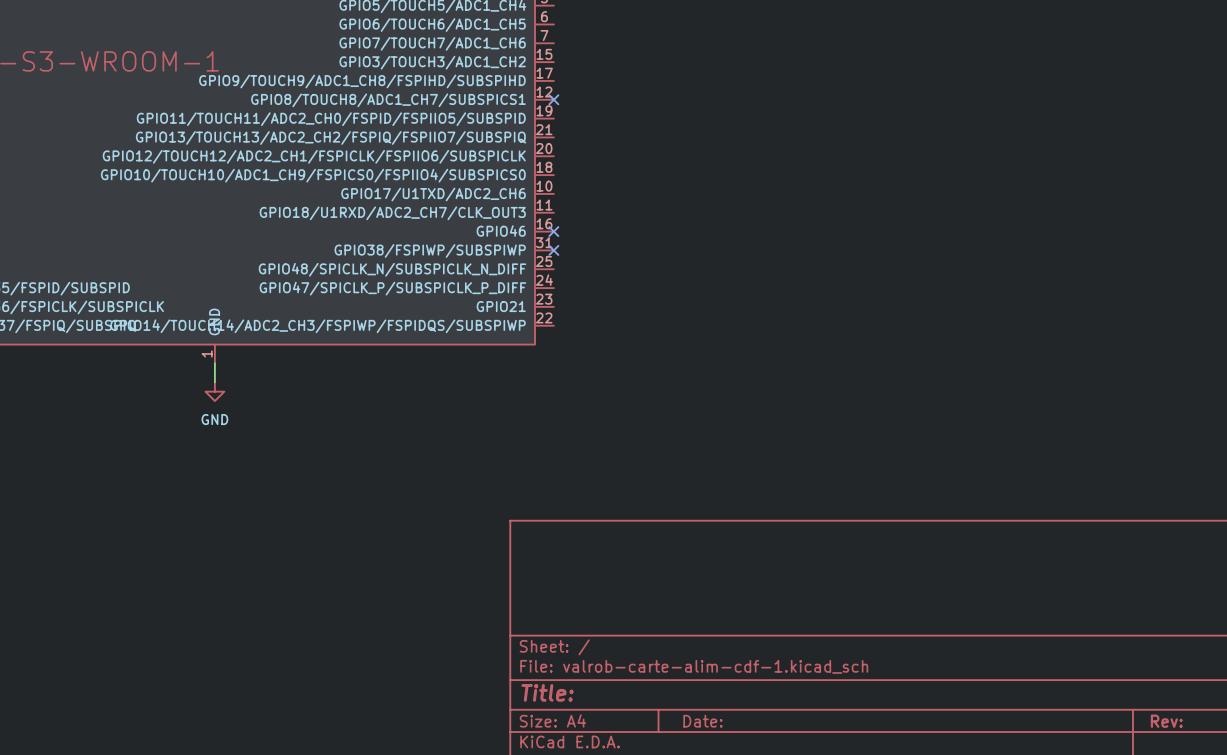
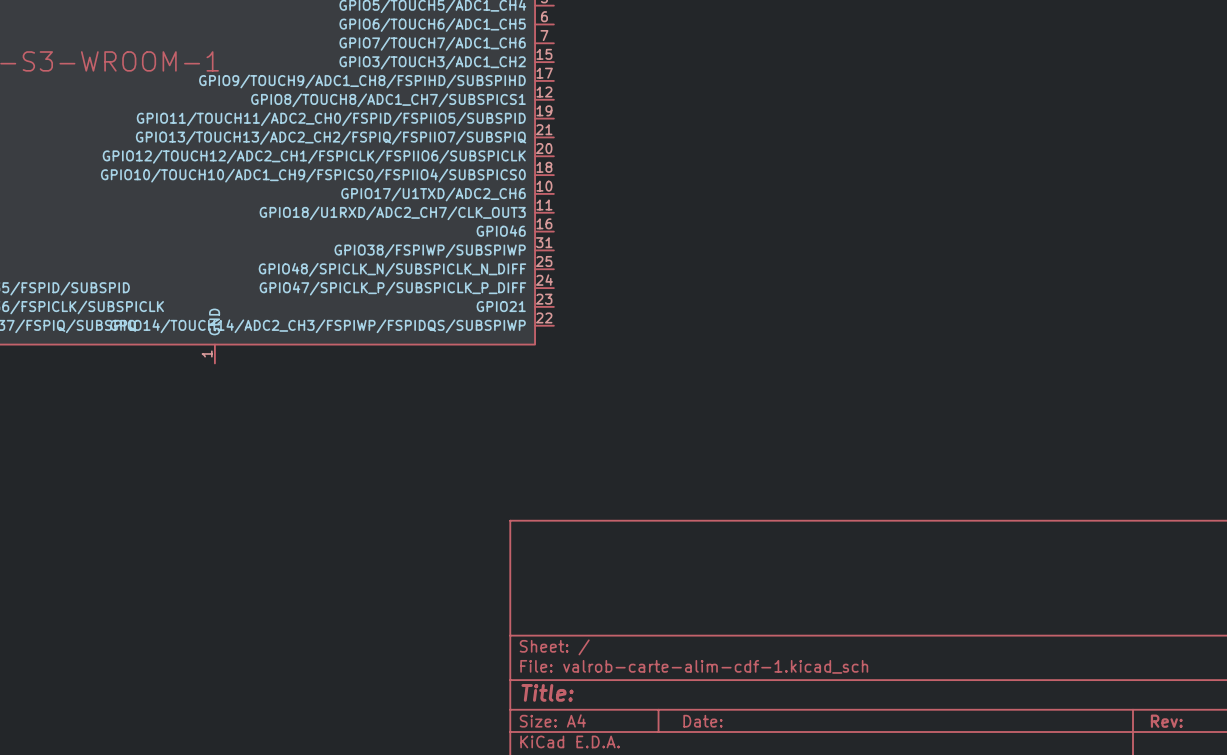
no-connect mark: (553, 99) -> none
no-connect mark: (553, 231) -> none
no-connect mark: (553, 250) -> none
wire: (214, 363) (214, 382) -> none
power symbol: GND (214, 391) -> none

